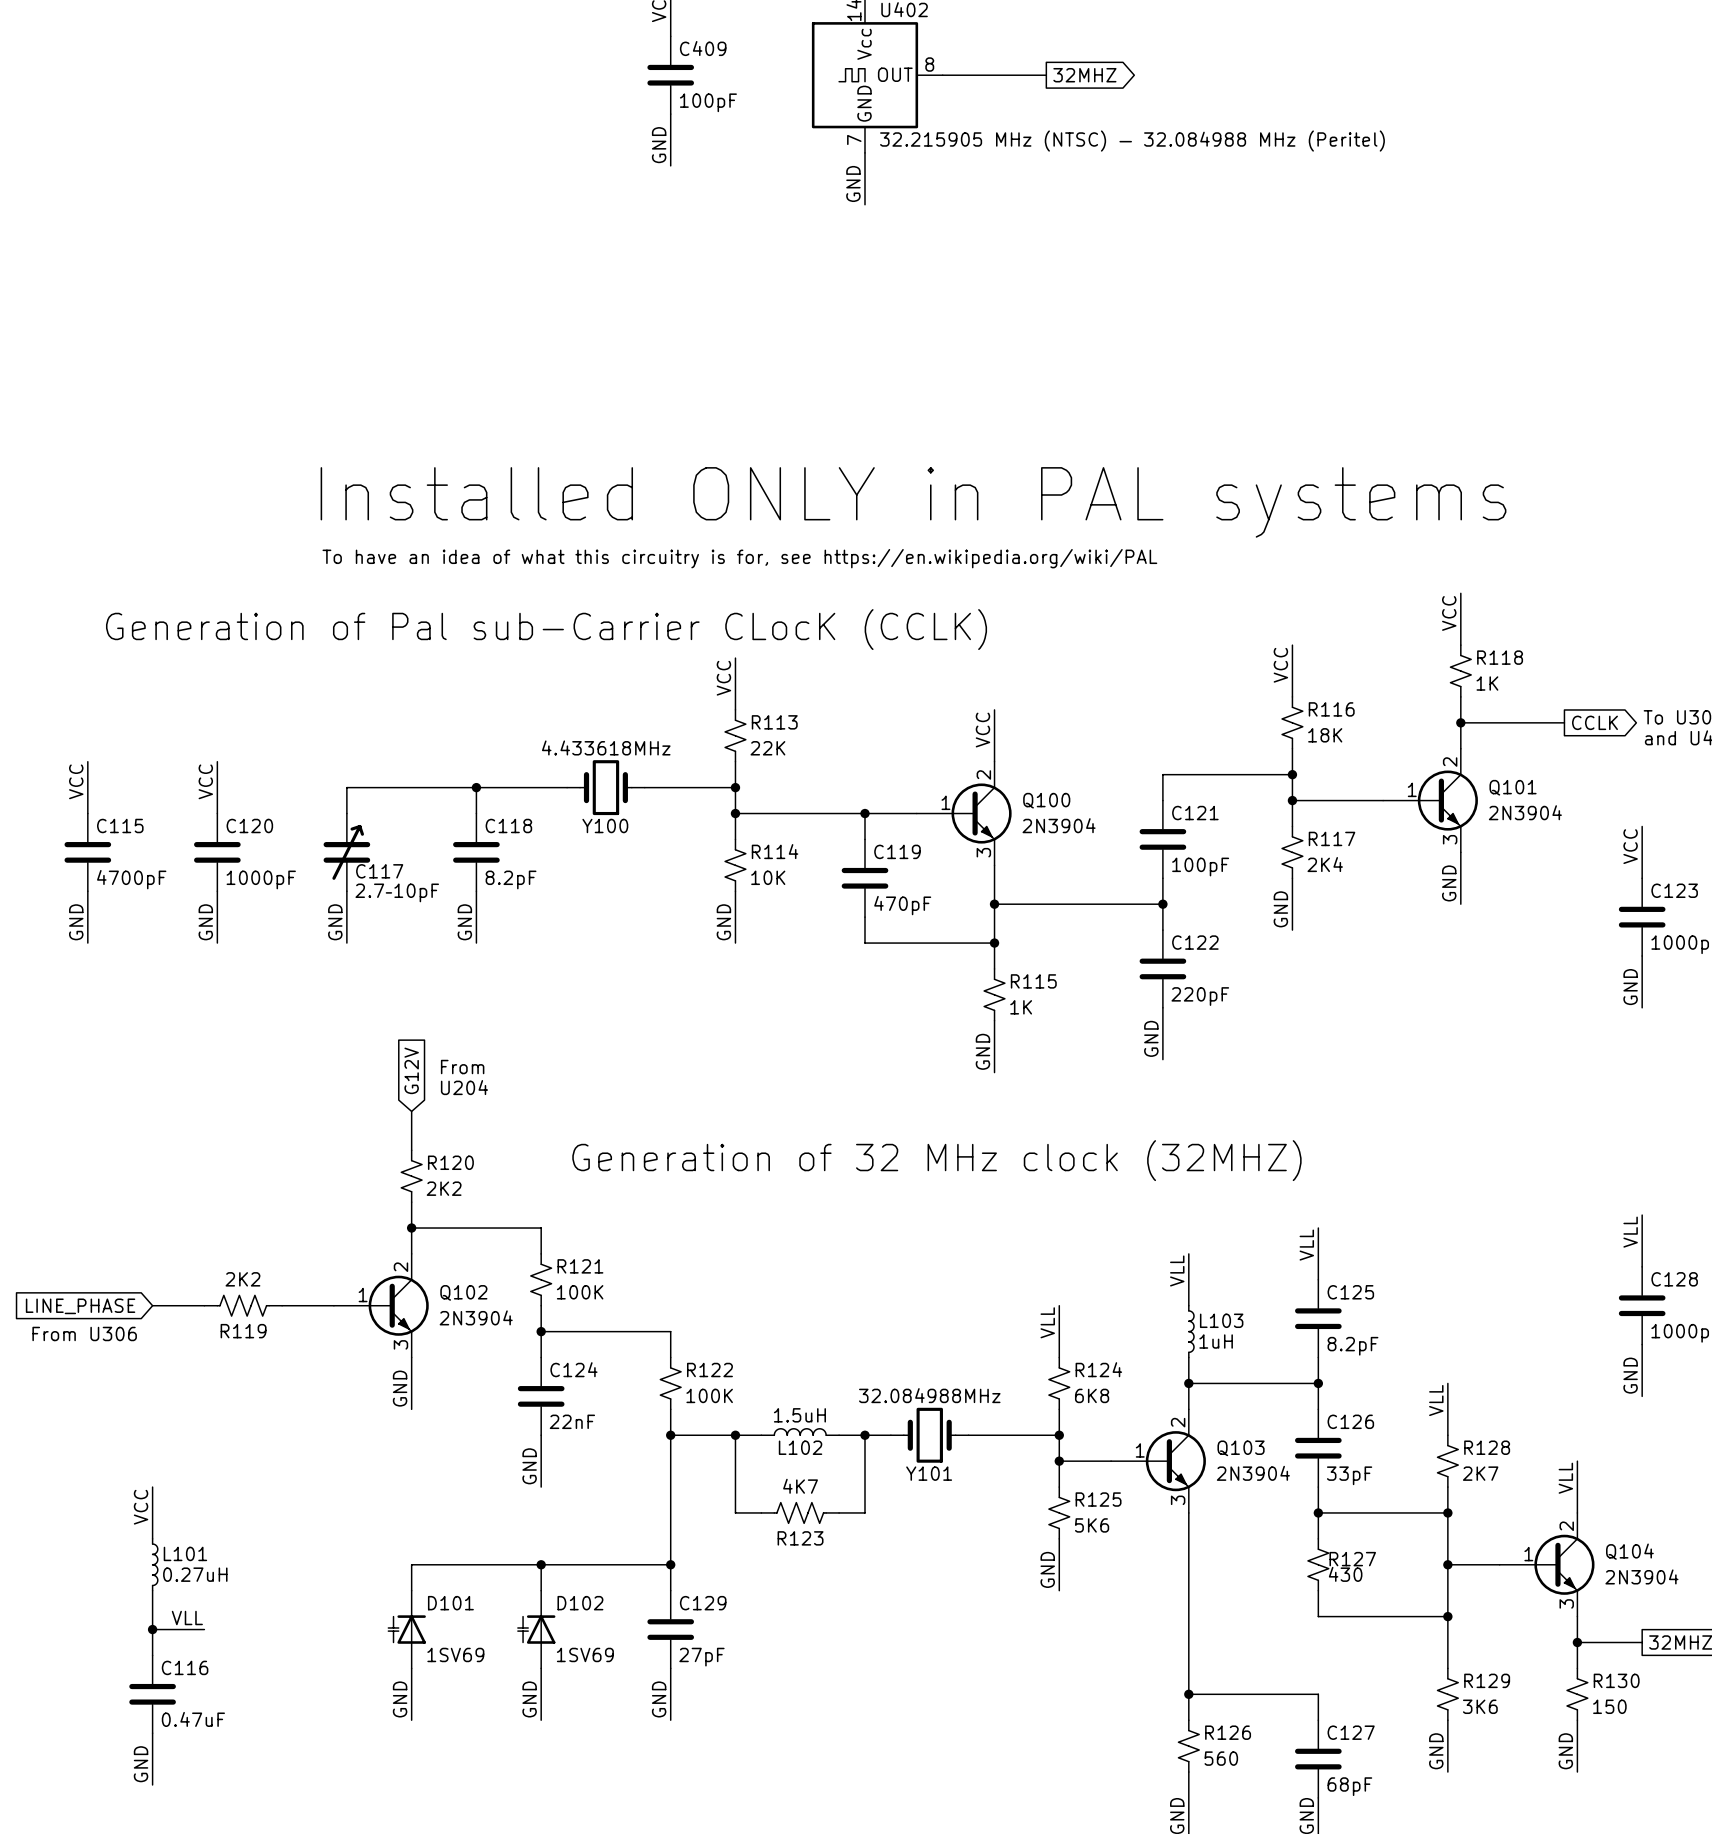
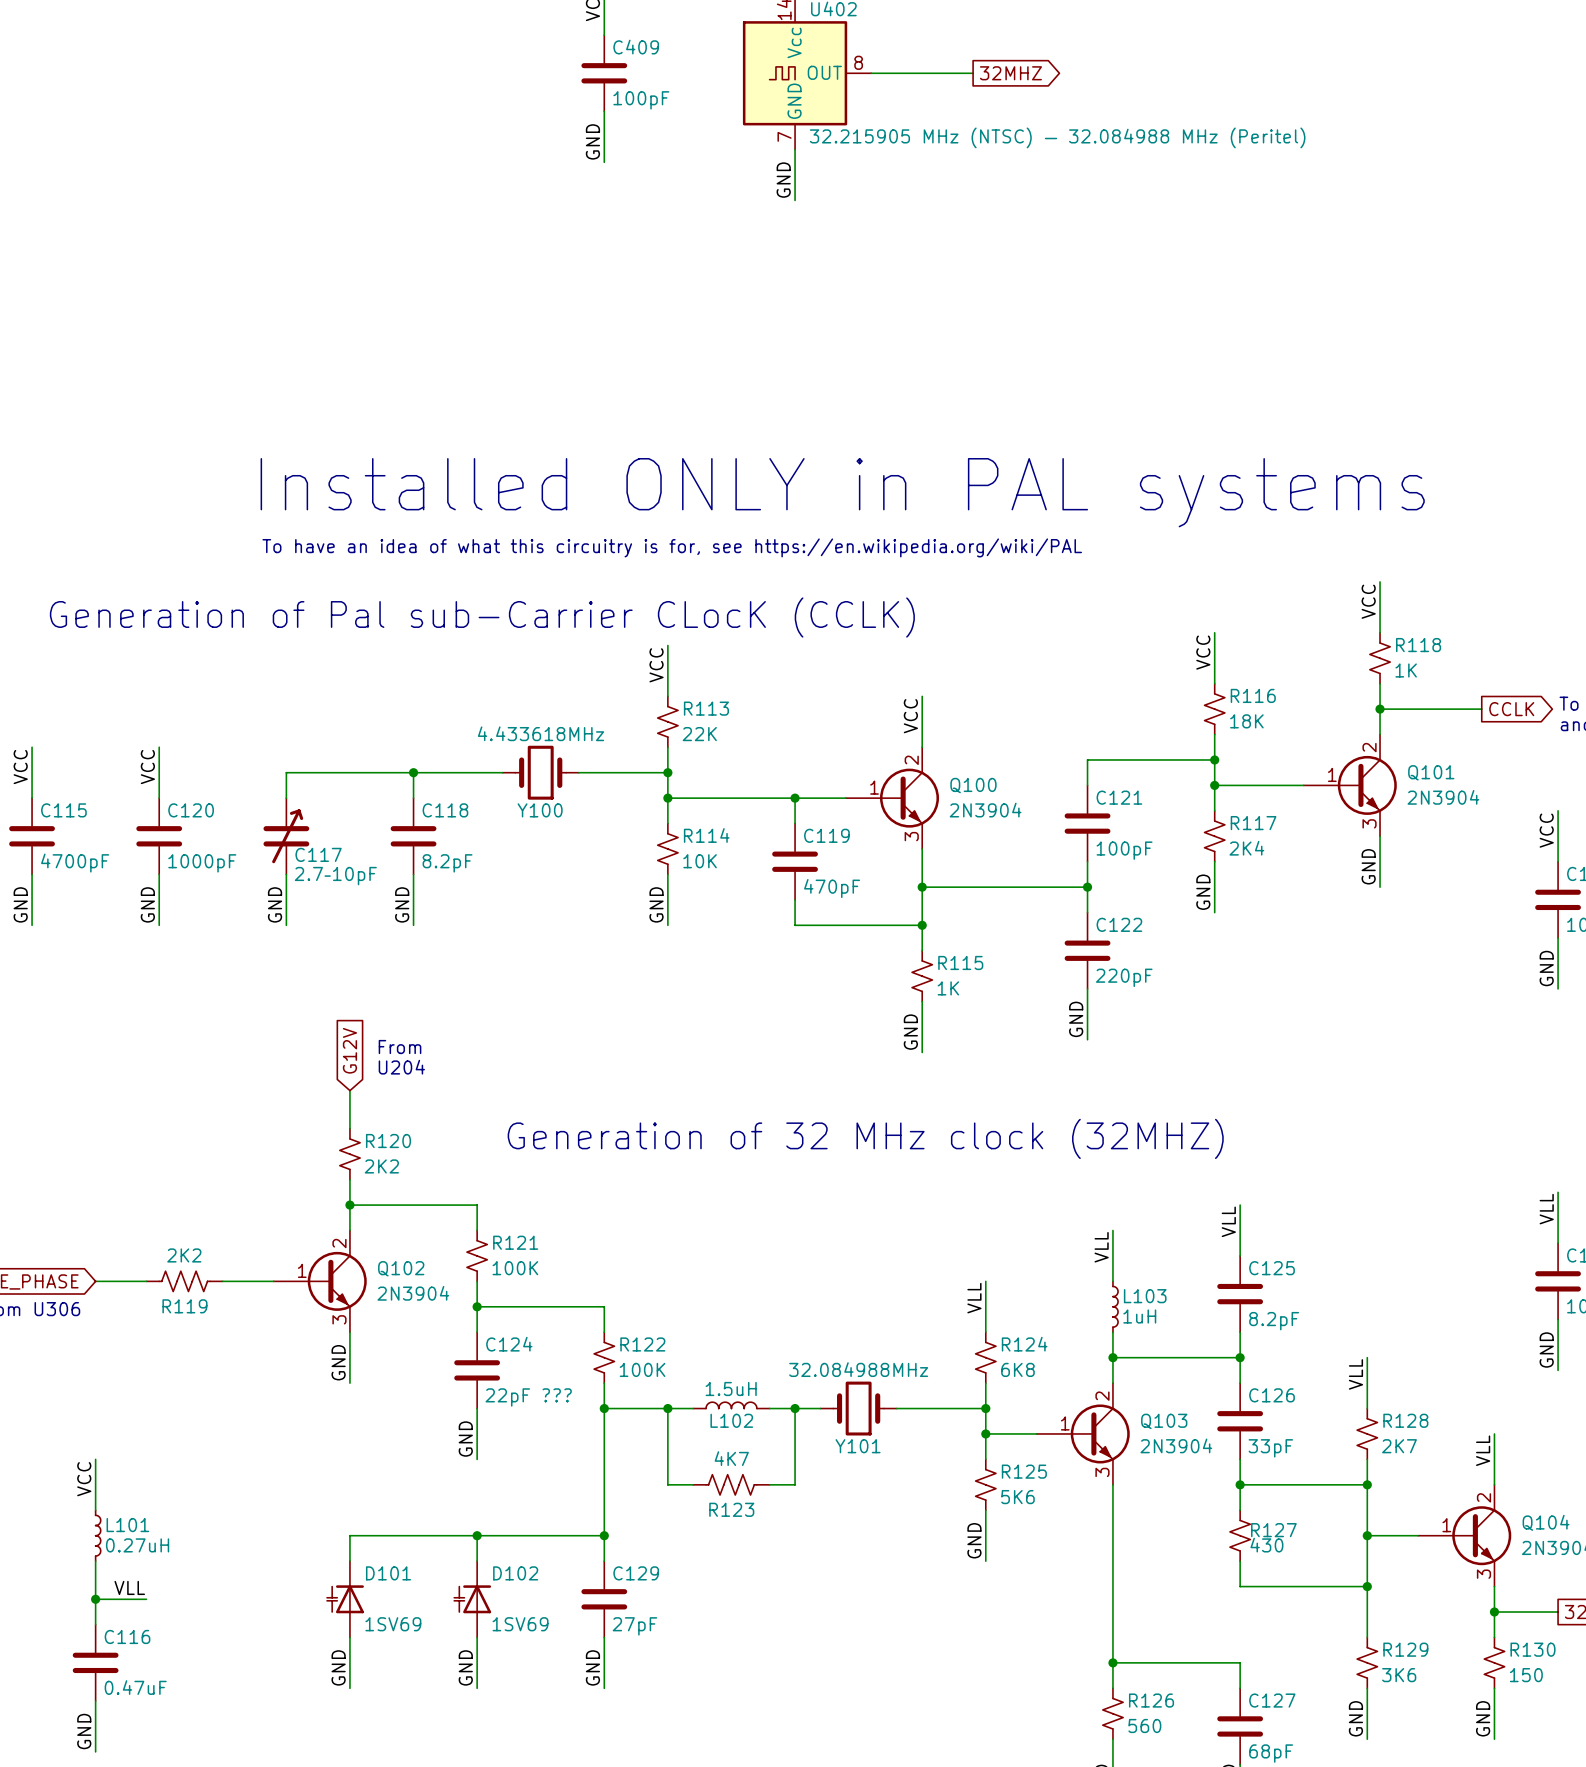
C124 value: 22nF (572, 1421) -> 22pF ??? (528, 1397)

